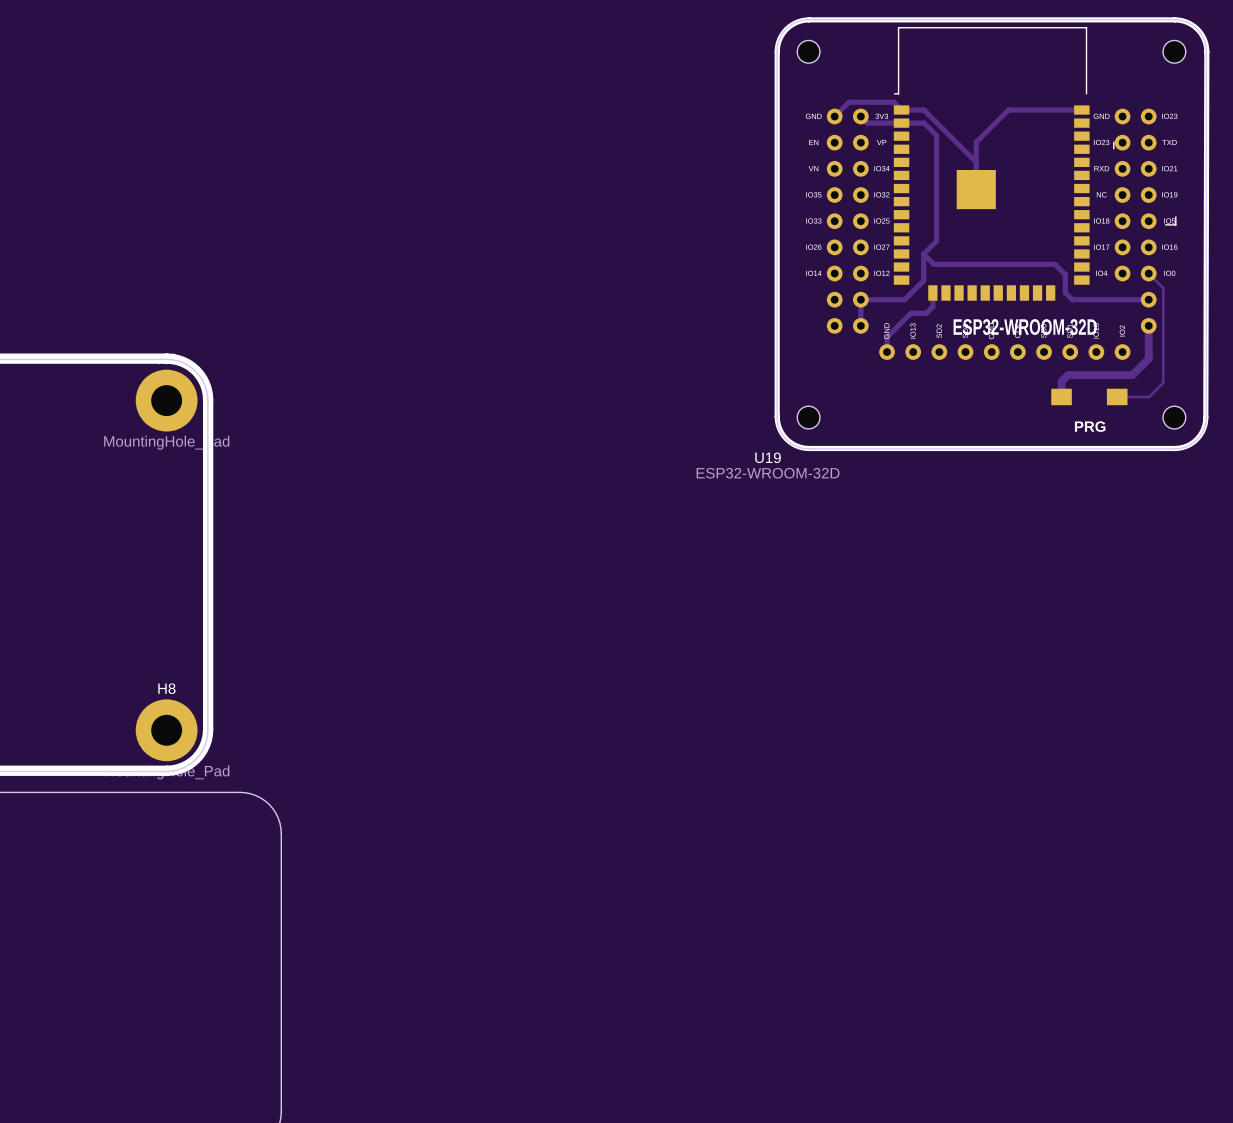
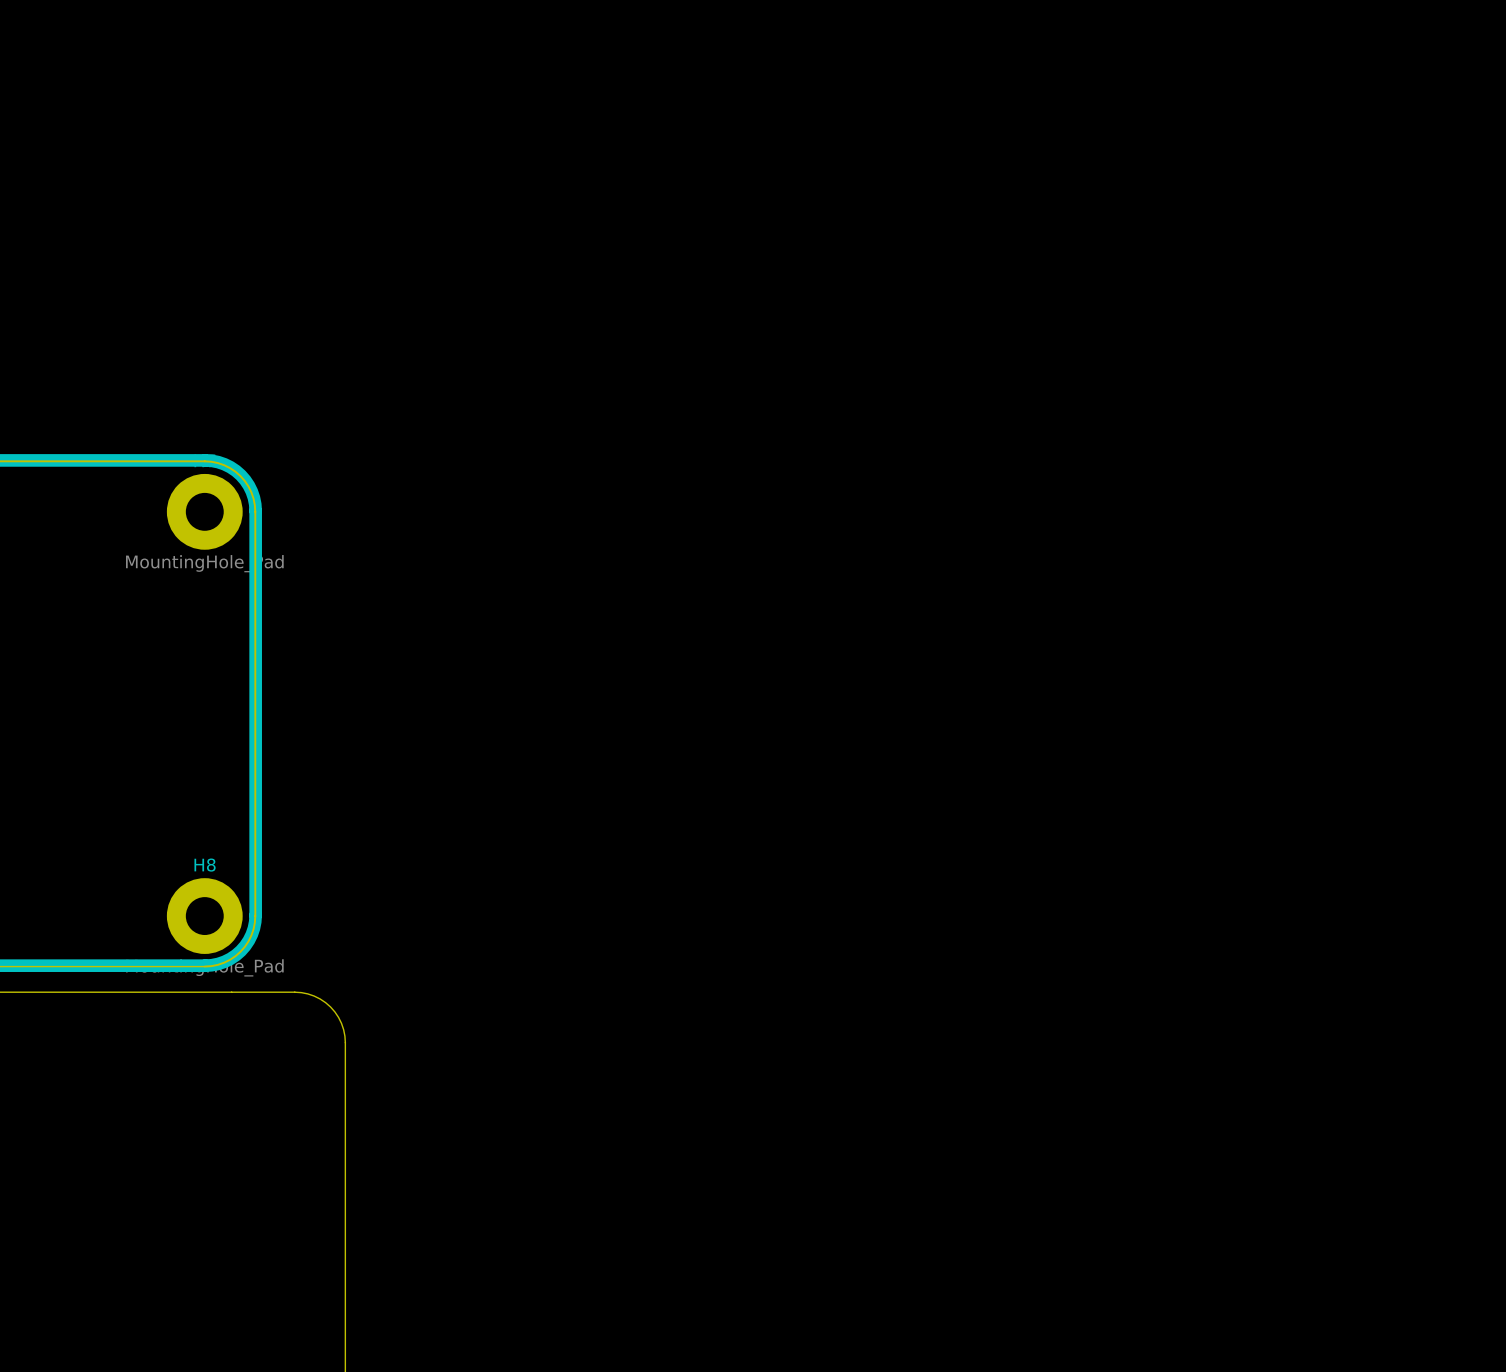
track: (1081, 110) (1008, 110) (976, 142) (976, 189) -> none
track: (834, 116) (848, 102) (893, 102) (901, 110) (924, 110) (976, 162) -> none
track: (860, 116) (867, 123) (924, 123) (936, 135) (936, 241) (923, 254) -> none
U19: ESP32-WROOM-32D (992, 234) -> none
track: (923, 254) (923, 280) (904, 299) (860, 299) (860, 325) -> none
track: (923, 254) (934, 264) (1055, 264) (1065, 274) (1065, 292) (1072, 299) (1148, 299) -> none
track: (1148, 273) (1163, 288) (1163, 382) (1149, 396) (1117, 396) -> none
track: (932, 293) (932, 306) (926, 313) (910, 313) (887, 337) (887, 352) -> none
track: (1148, 325) (1148, 358) (1132, 375) (1067, 375) (1061, 381) (1061, 396) -> none

